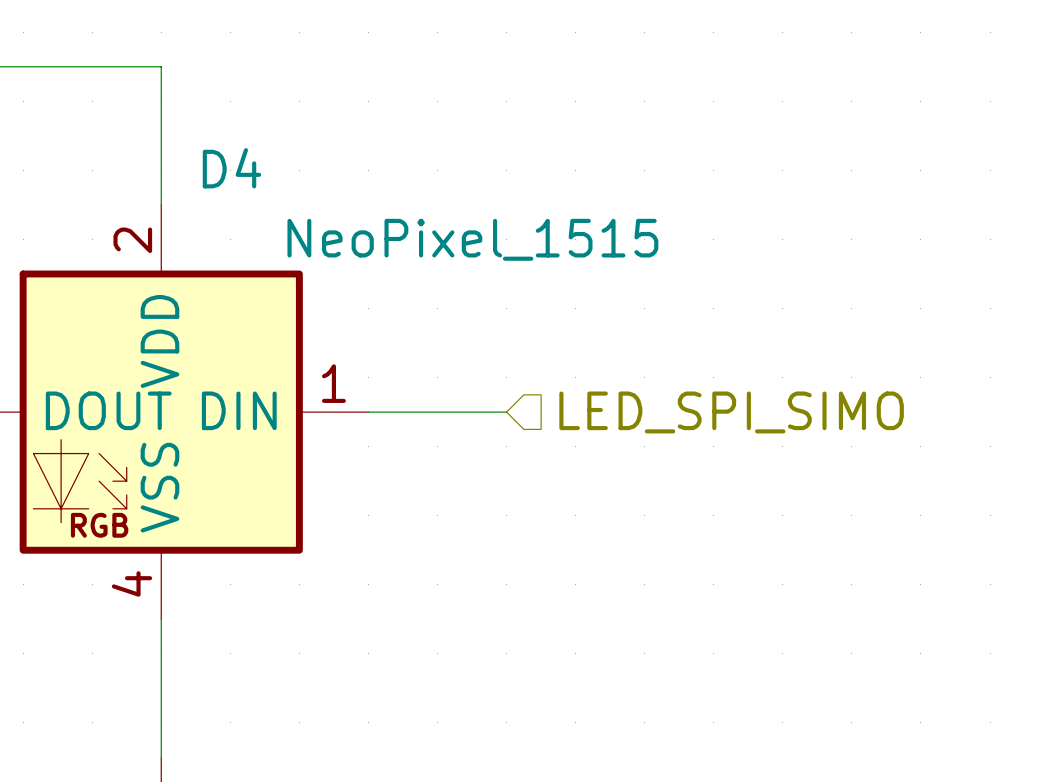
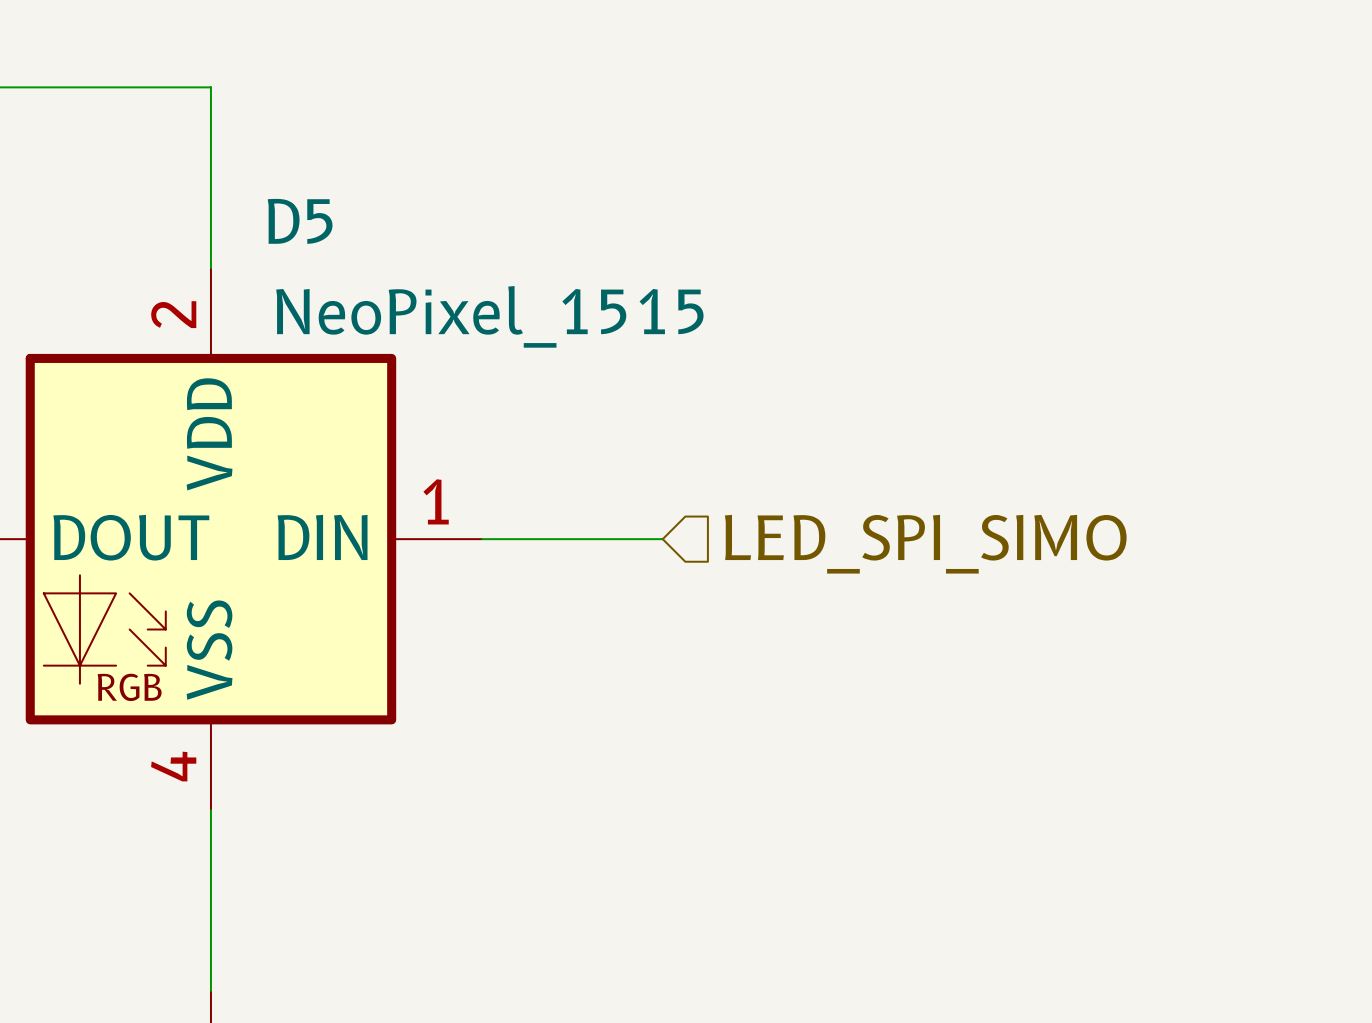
D4 name: D4 (231, 168) -> D5 (300, 221)
D4 value position: NeoPixel_1515 (472, 239) -> NeoPixel_1515 (489, 316)

